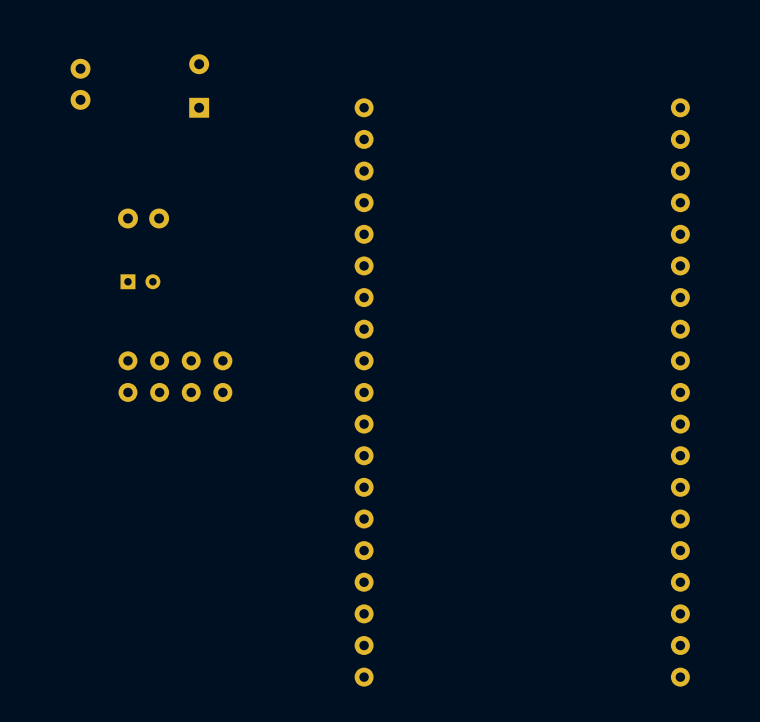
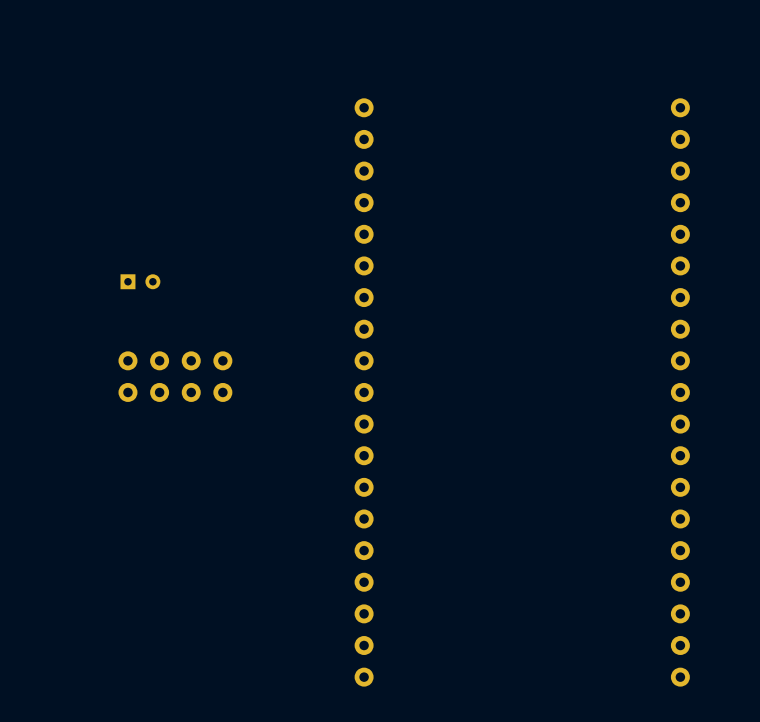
part: (80, 84) -> none
part: (199, 85) -> none
part: (143, 218) -> none

